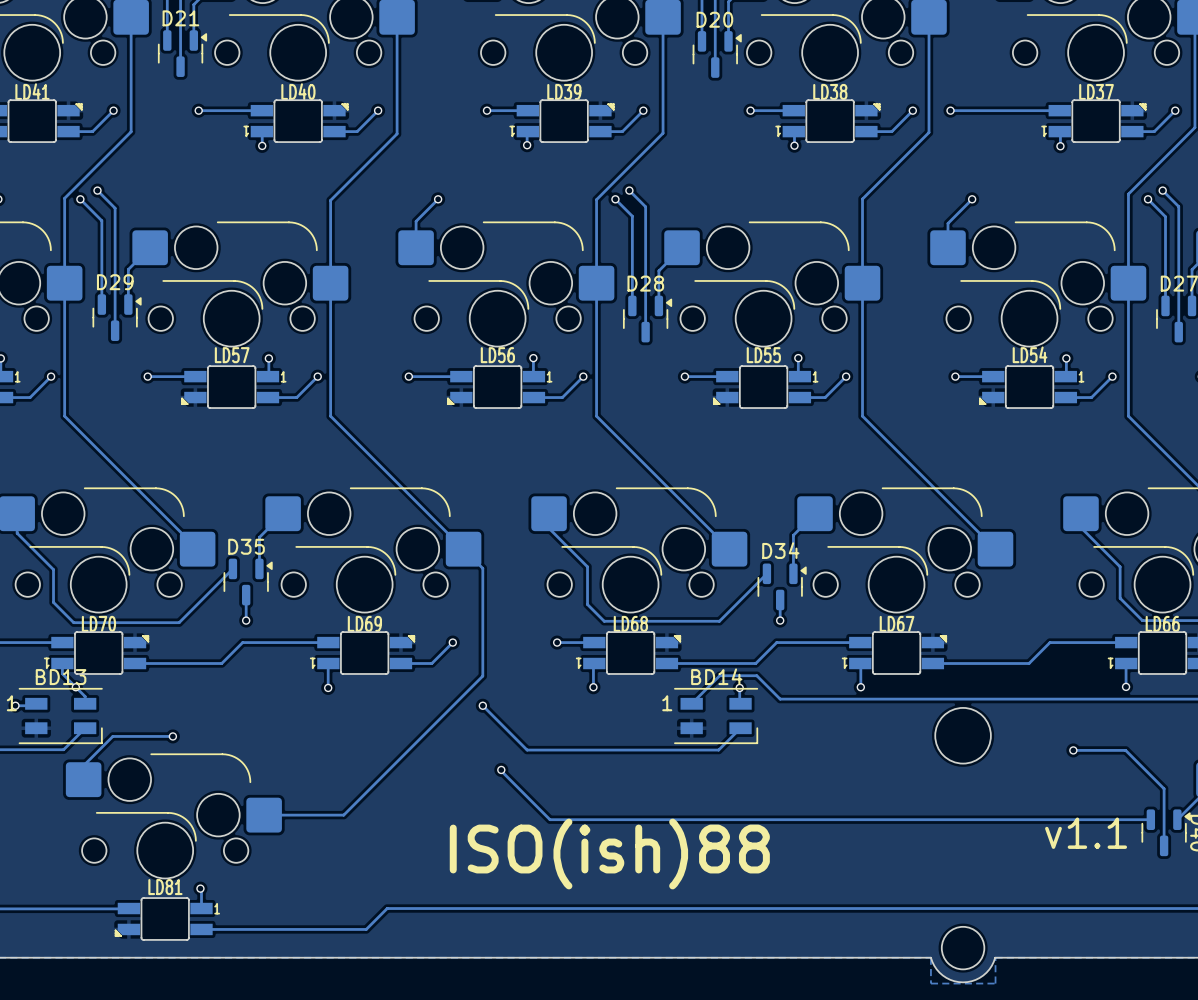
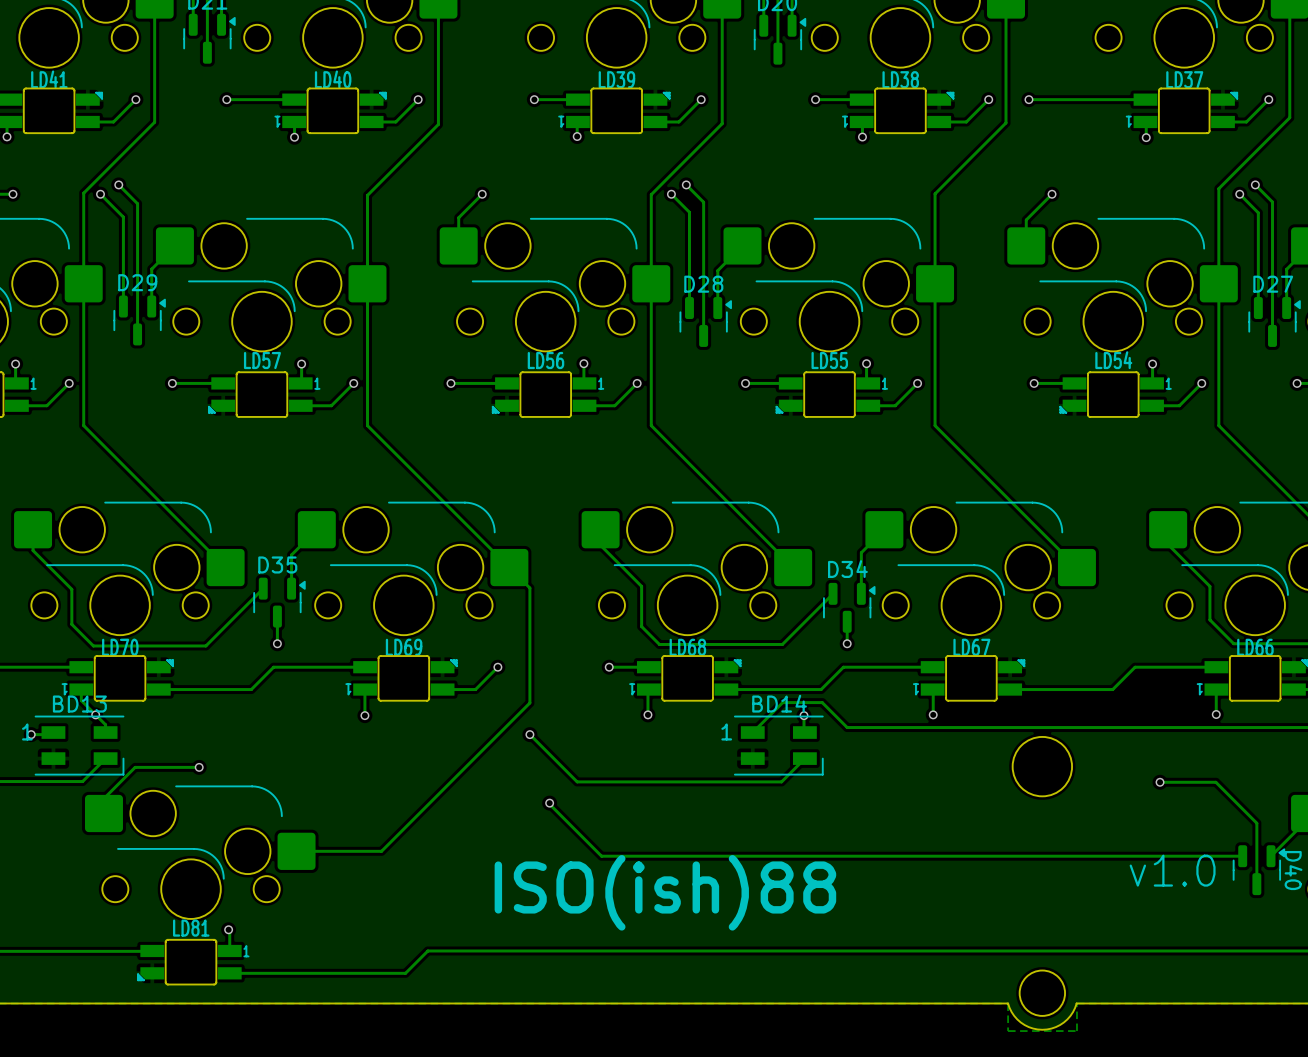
text: v1.1 (1086, 833) -> v1.0 (1172, 870)

